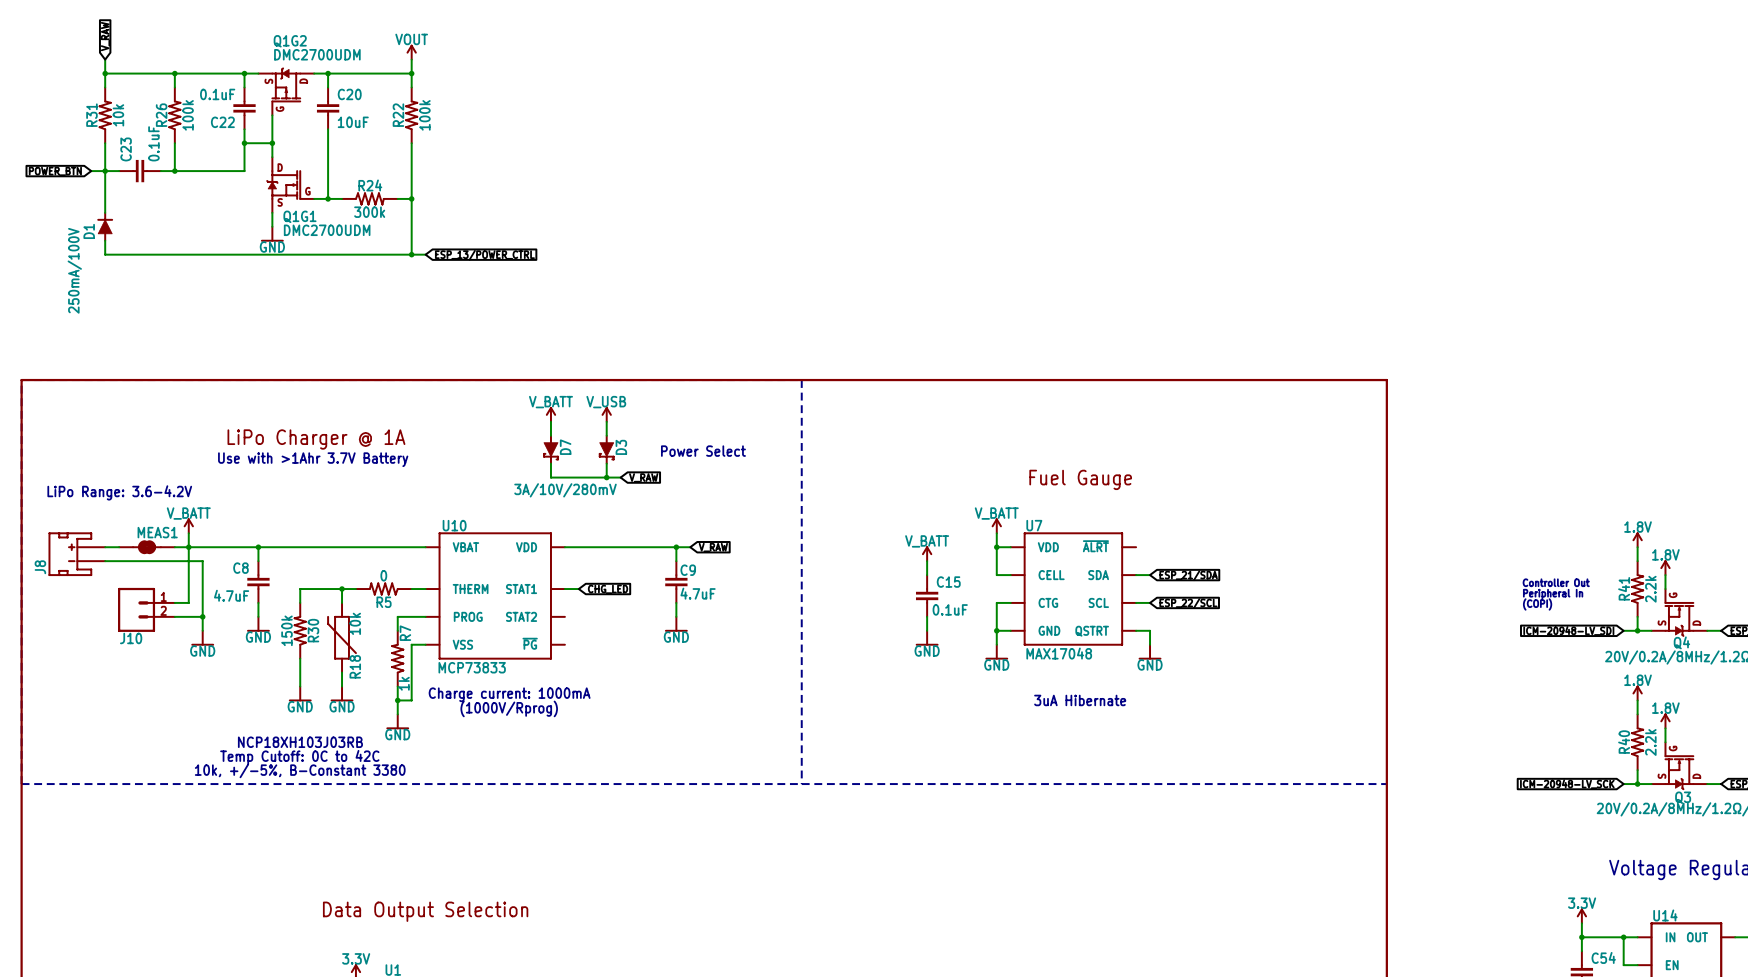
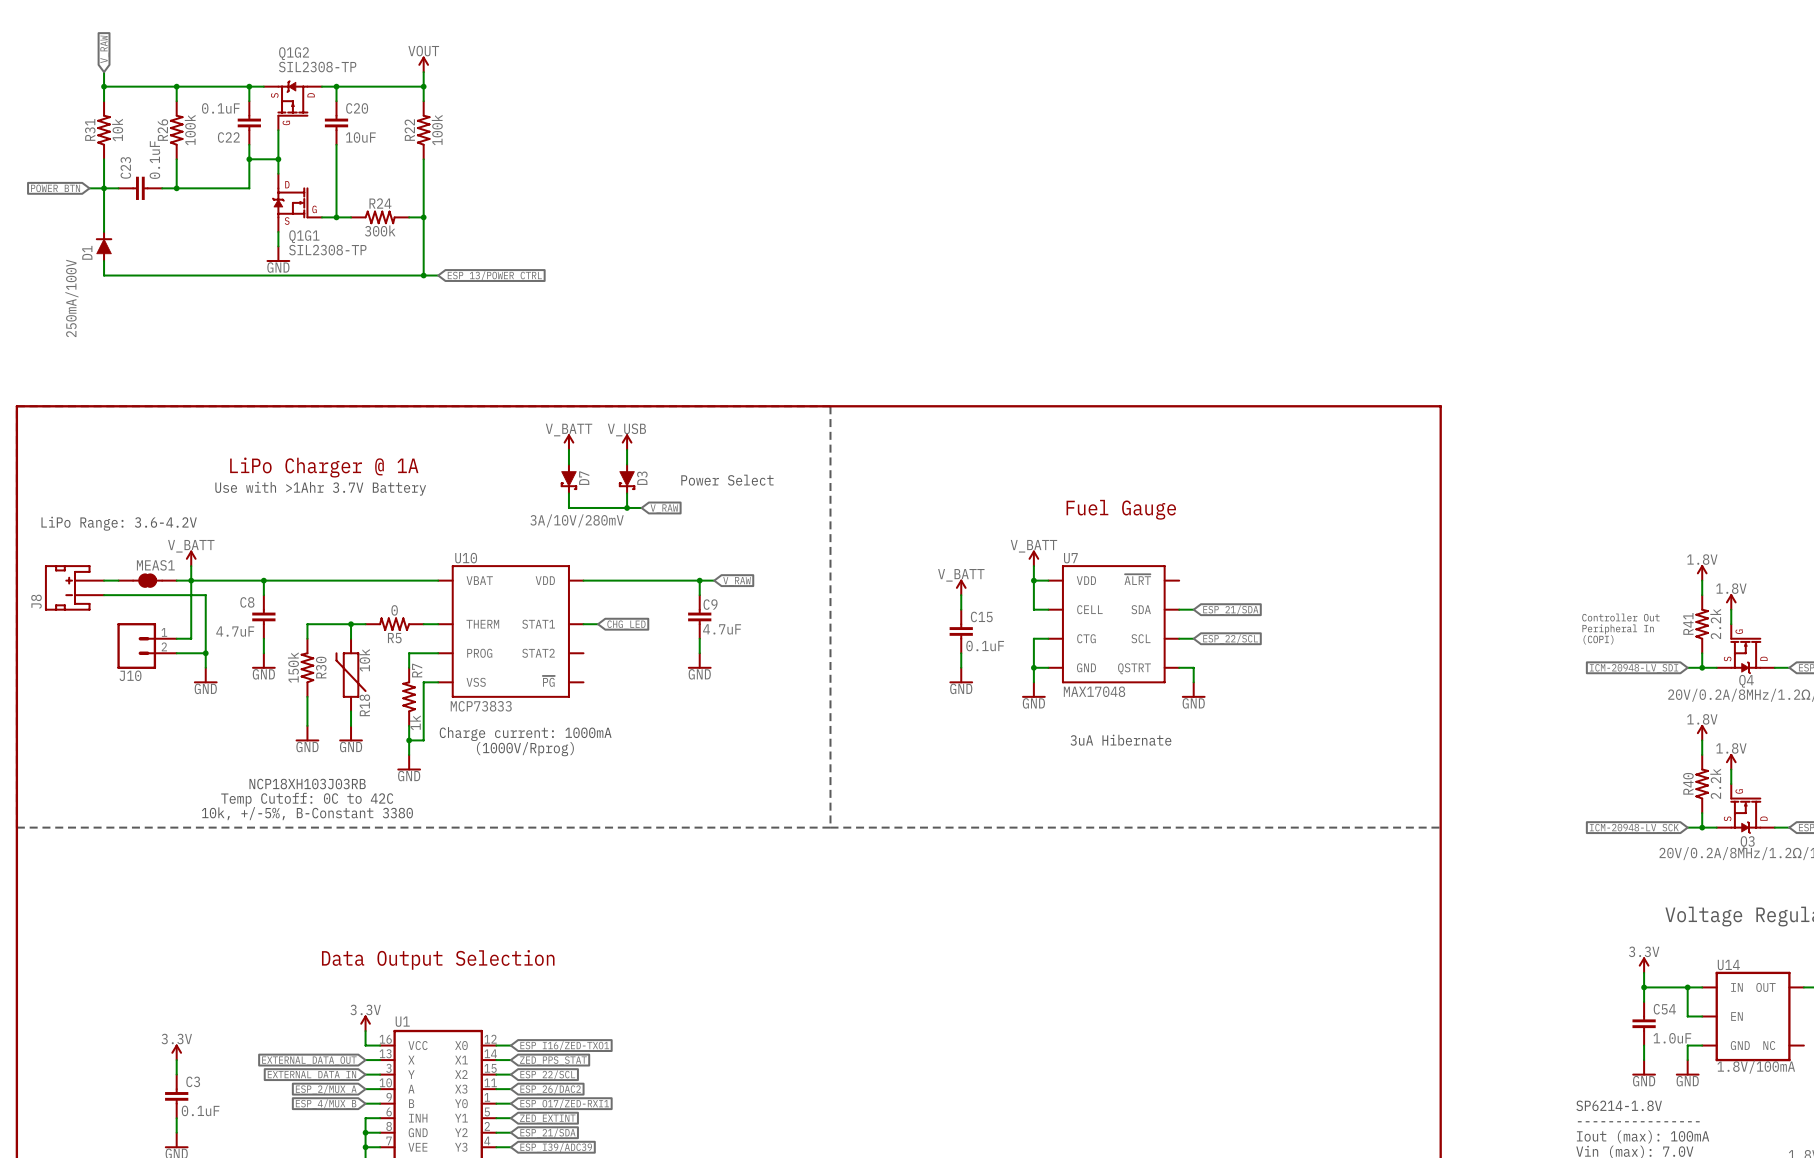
Q1G2 value: DMC2700UDM (317, 54) -> SIL2308-TP (317, 67)
Q1G1 value: DMC2700UDM (327, 230) -> SIL2308-TP (327, 250)

